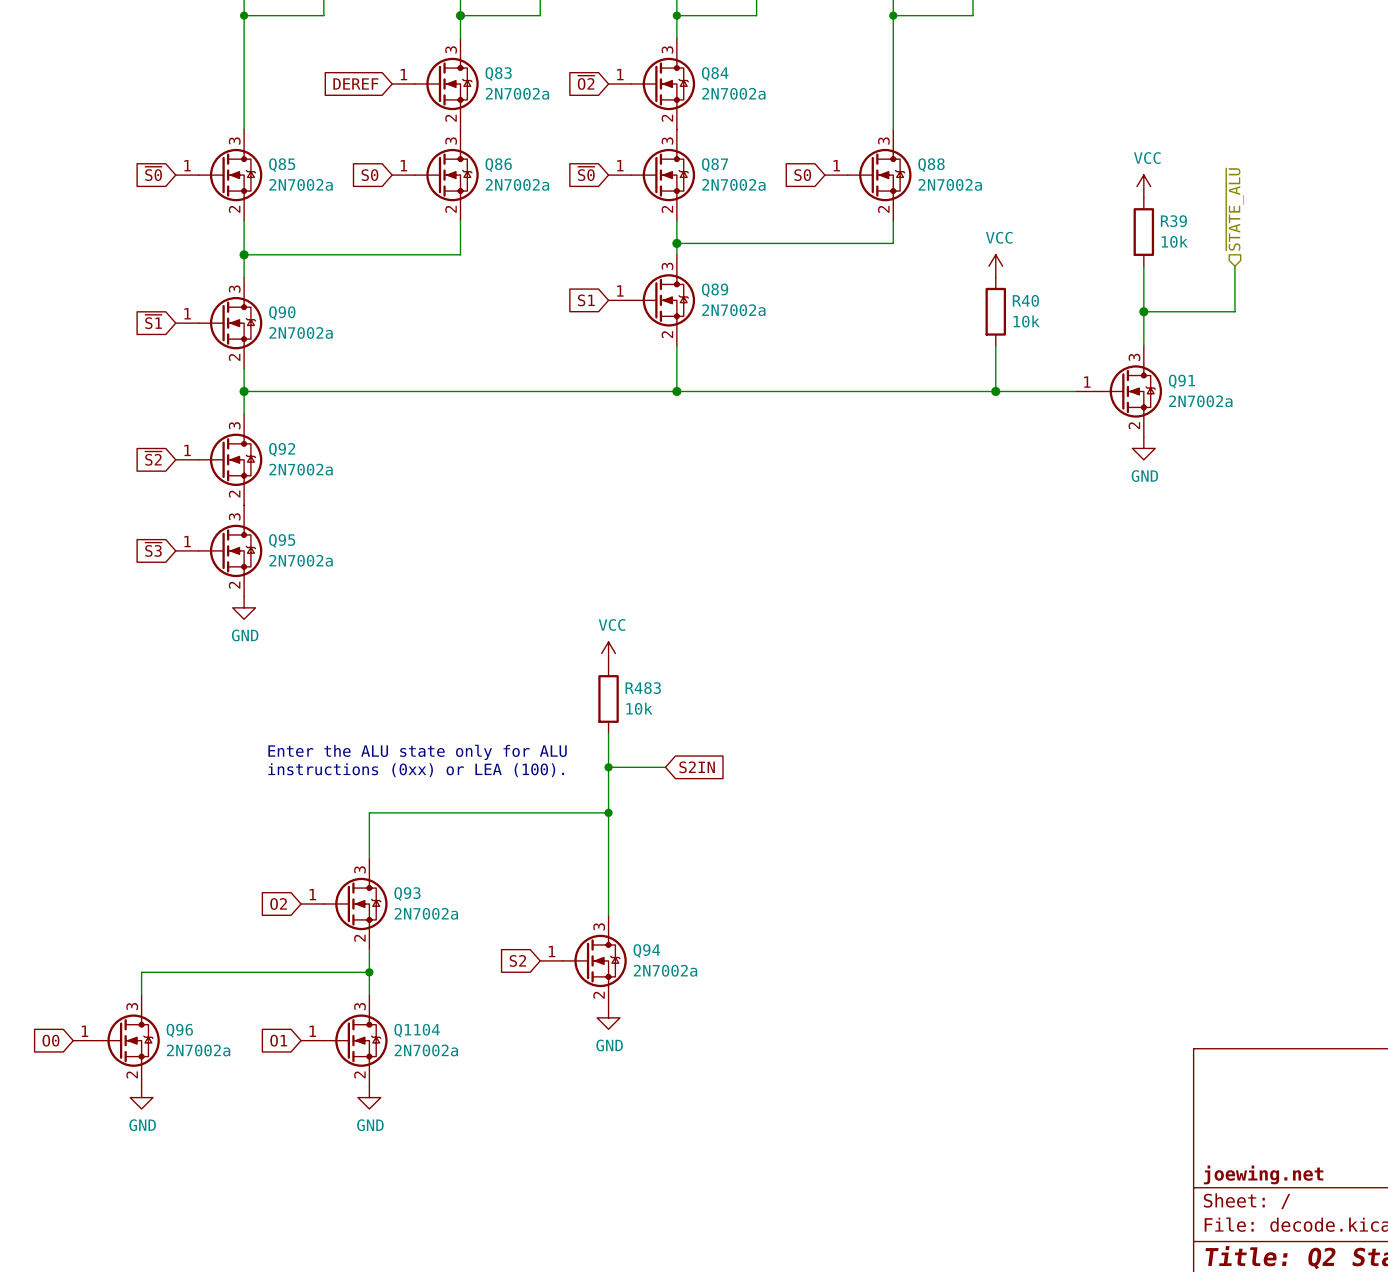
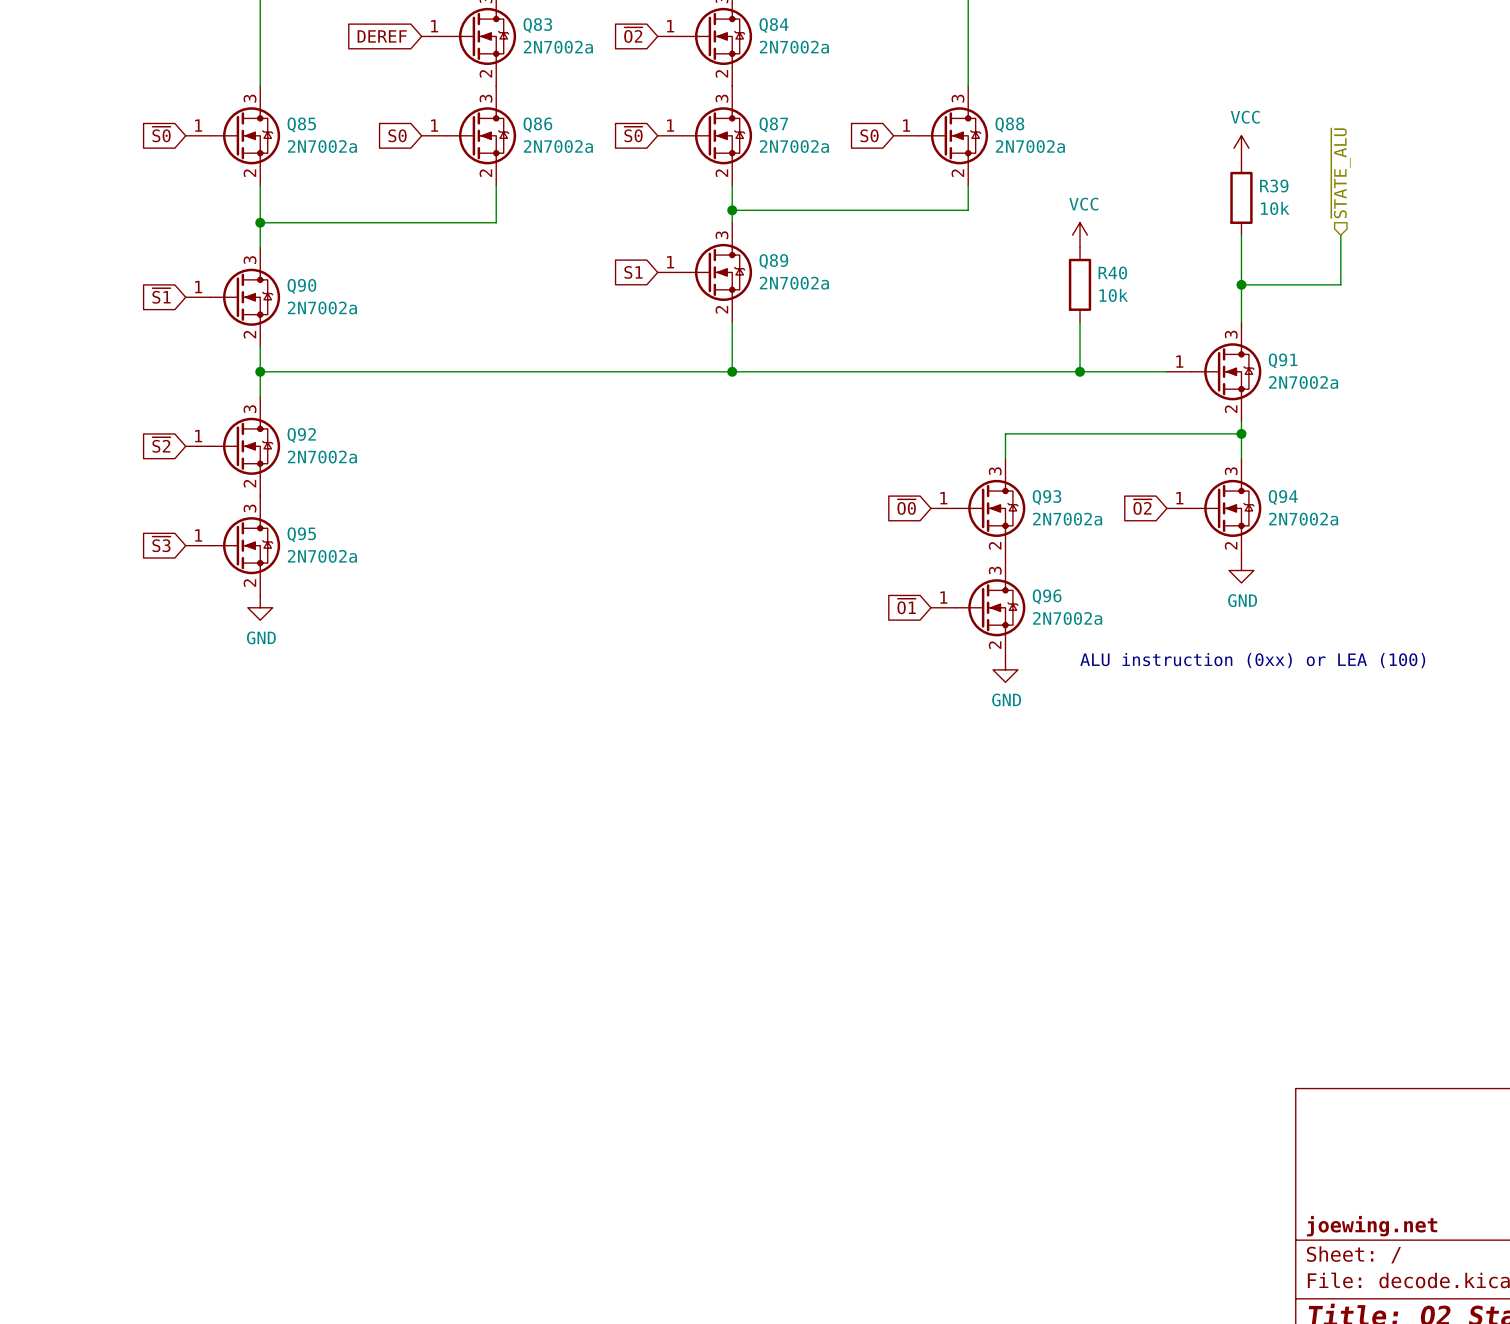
wire: none -> (1241, 421) (1241, 458)
wire: none -> (1241, 433) (1005, 433) (1005, 458)
junction: none -> (1241, 433)
power symbol position: GND (1143, 448) -> GND (1241, 570)
global label: none -> ~{O0} (906, 507)
global label: none -> ~{O2} (1142, 507)
global label: none -> ~{O1} (906, 606)
power symbol: VCC (608, 653) -> none
text: none -> ALU instruction (0xx) or LEA (100) (1252, 660)
power symbol: none -> GND (1005, 669)
R483: 10k (608, 698) -> none
wire: (608, 733) (608, 915) -> none
text: Enter the ALU state only for ALU (417, 752) -> none
wire: (608, 767) (665, 767) -> none
junction: (608, 767) -> none
global label: S2IN (697, 767) -> none
text: instructions (0xx) or LEA (100). (416, 770) -> none
wire: (608, 812) (369, 812) (369, 858) -> none
junction: (608, 812) -> none
Q93 position: (344, 903) -> (978, 508)
global label: O2 (278, 904) -> none
wire: (369, 949) (369, 995) -> none
global label: S2 (517, 960) -> none
Q94 position: (583, 960) -> (1214, 508)
wire: (369, 972) (141, 972) (141, 995) -> none
junction: (369, 972) -> none
power symbol: GND (608, 1017) -> none
global label: O0 (50, 1040) -> none
Q96 position: (116, 1040) -> (978, 607)
global label: O1 (278, 1040) -> none
Q1104: 2N7002a (344, 1040) -> none
power symbol: GND (141, 1097) -> none
power symbol: GND (369, 1097) -> none

